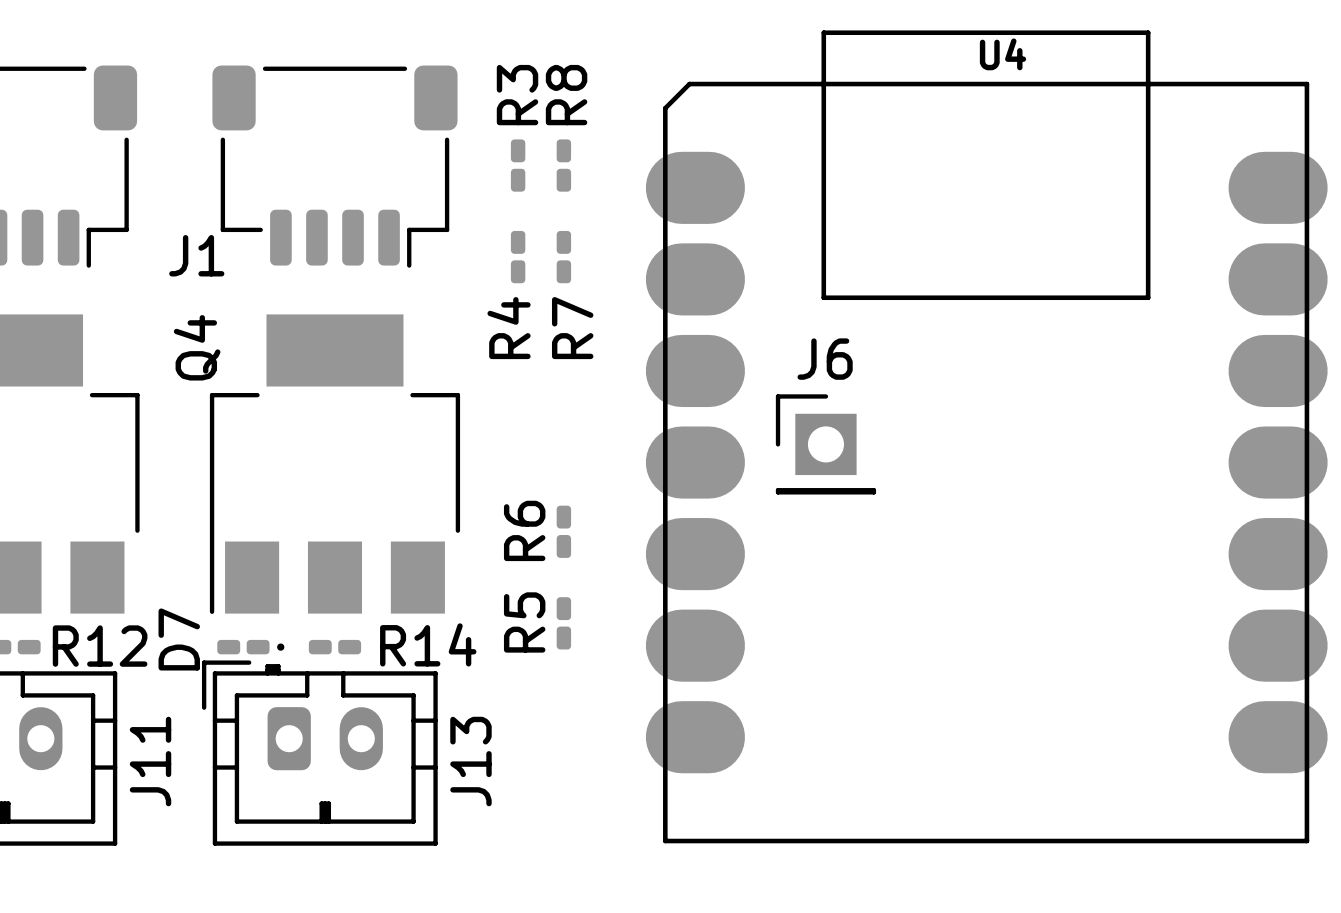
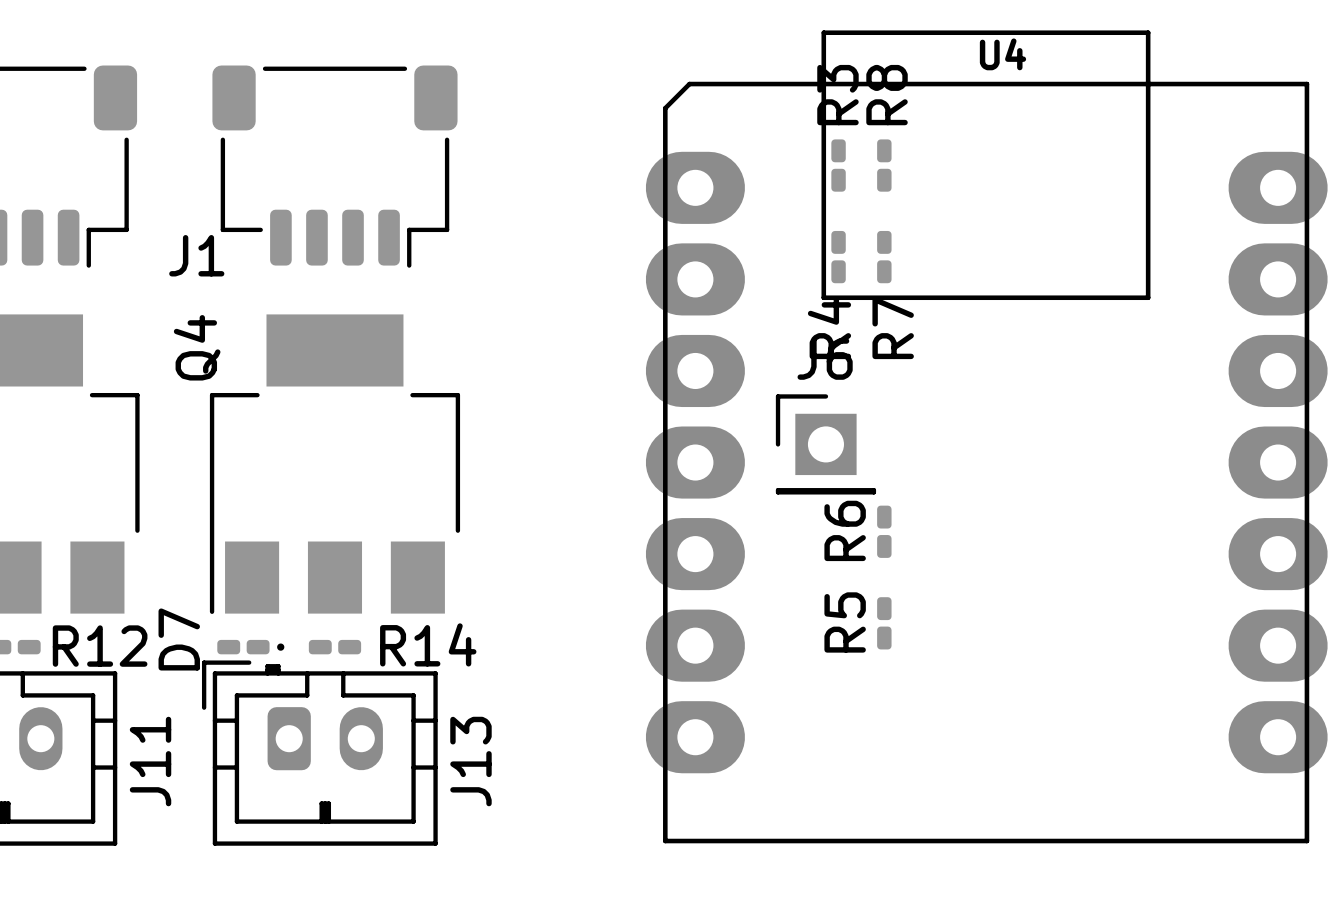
U4 footprint: [645, 30, 1328, 844] -> [645, 30, 1328, 844]
R3 position: (518, 165) -> (838, 165)
R8 position: (563, 165) -> (884, 165)
R4 position: (518, 257) -> (838, 257)
R7 position: (563, 257) -> (884, 257)
R6 position: (563, 531) -> (884, 531)
R5 position: (563, 623) -> (884, 623)

